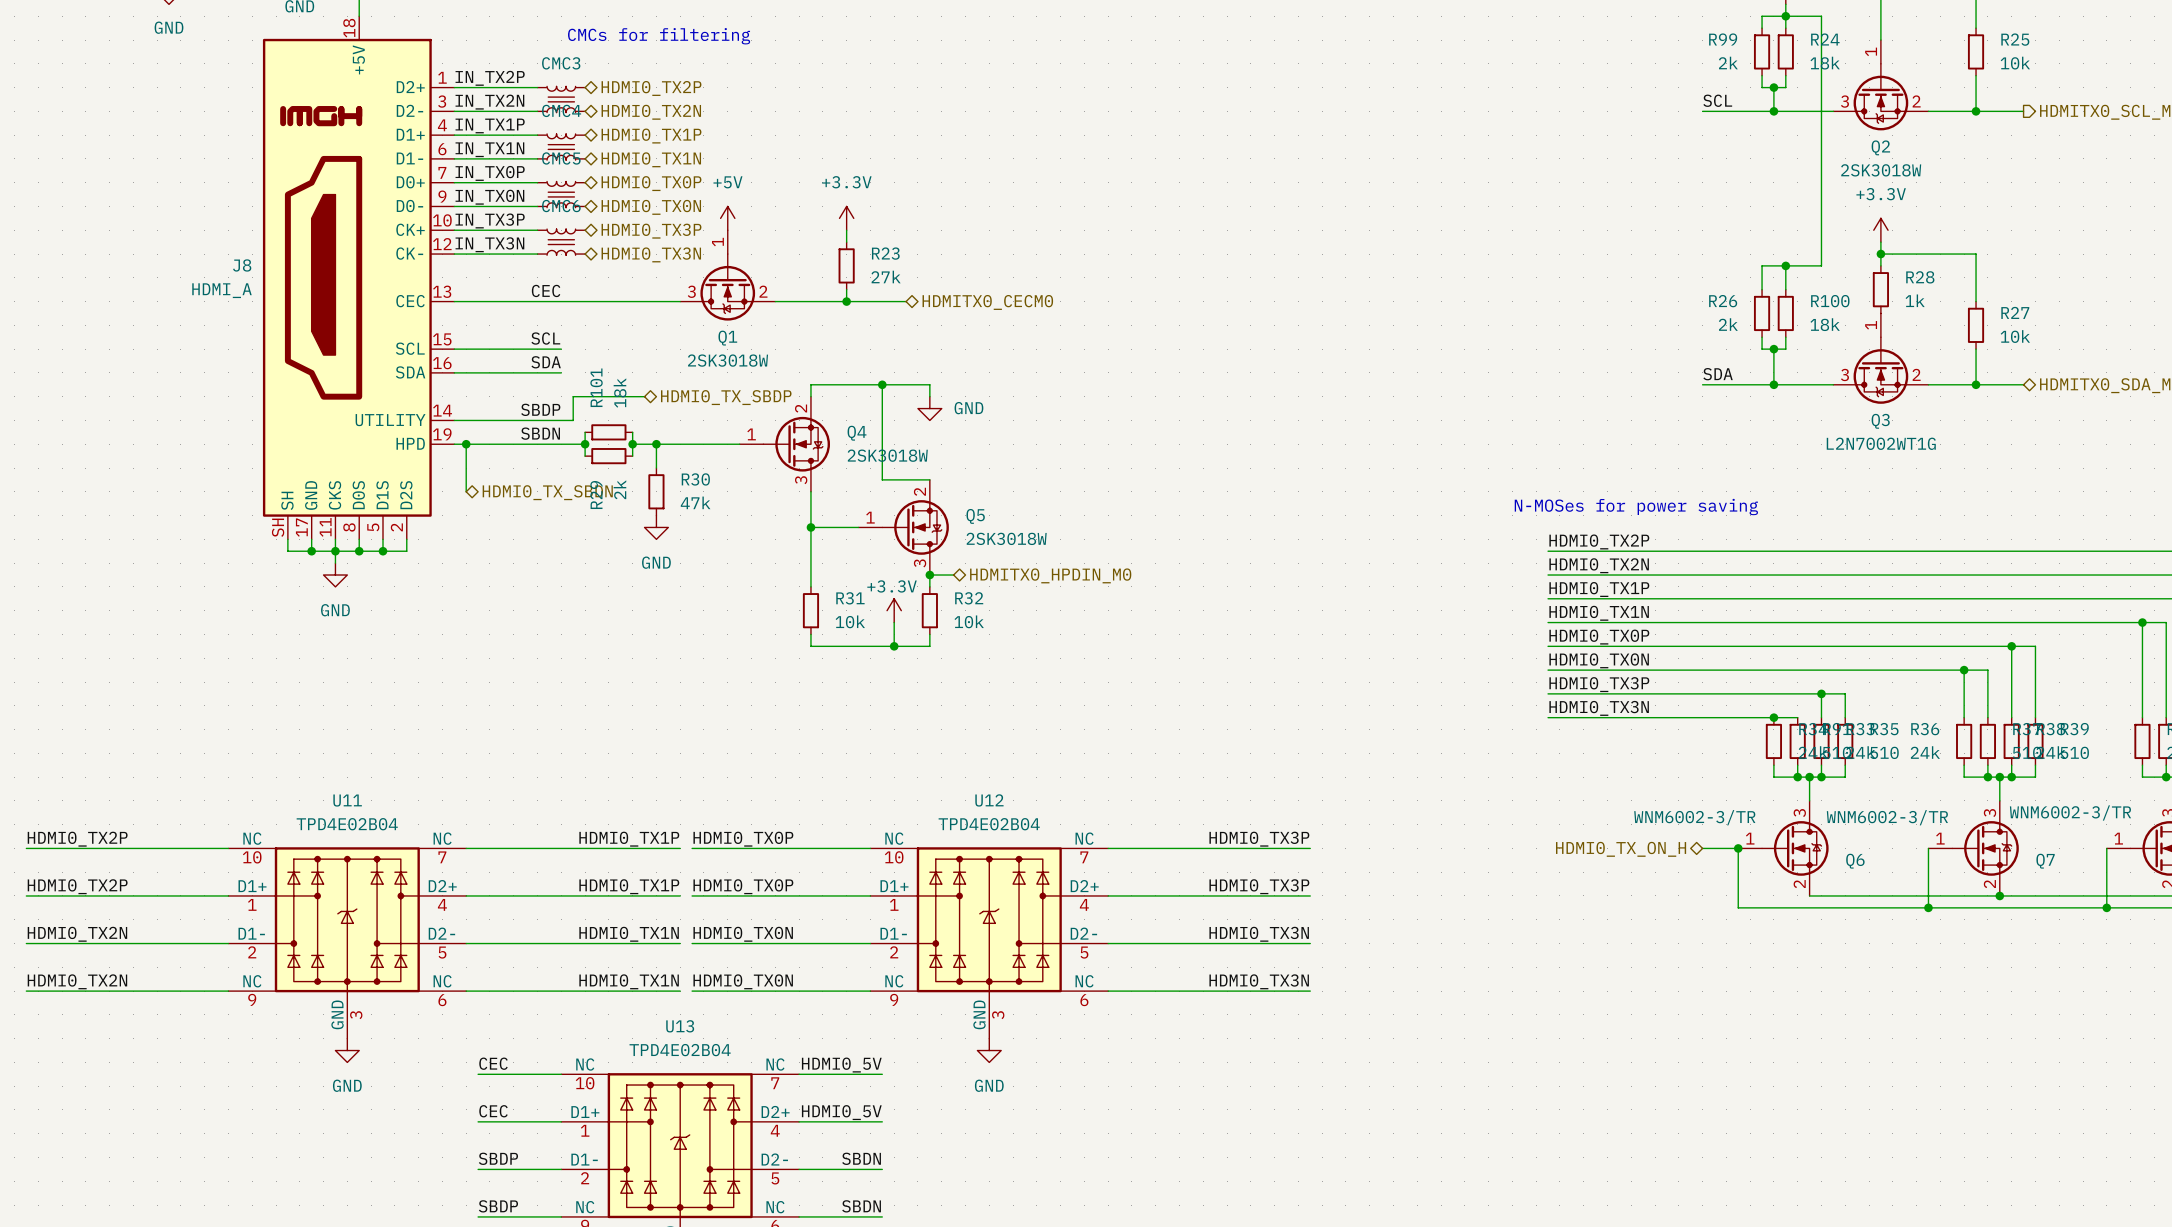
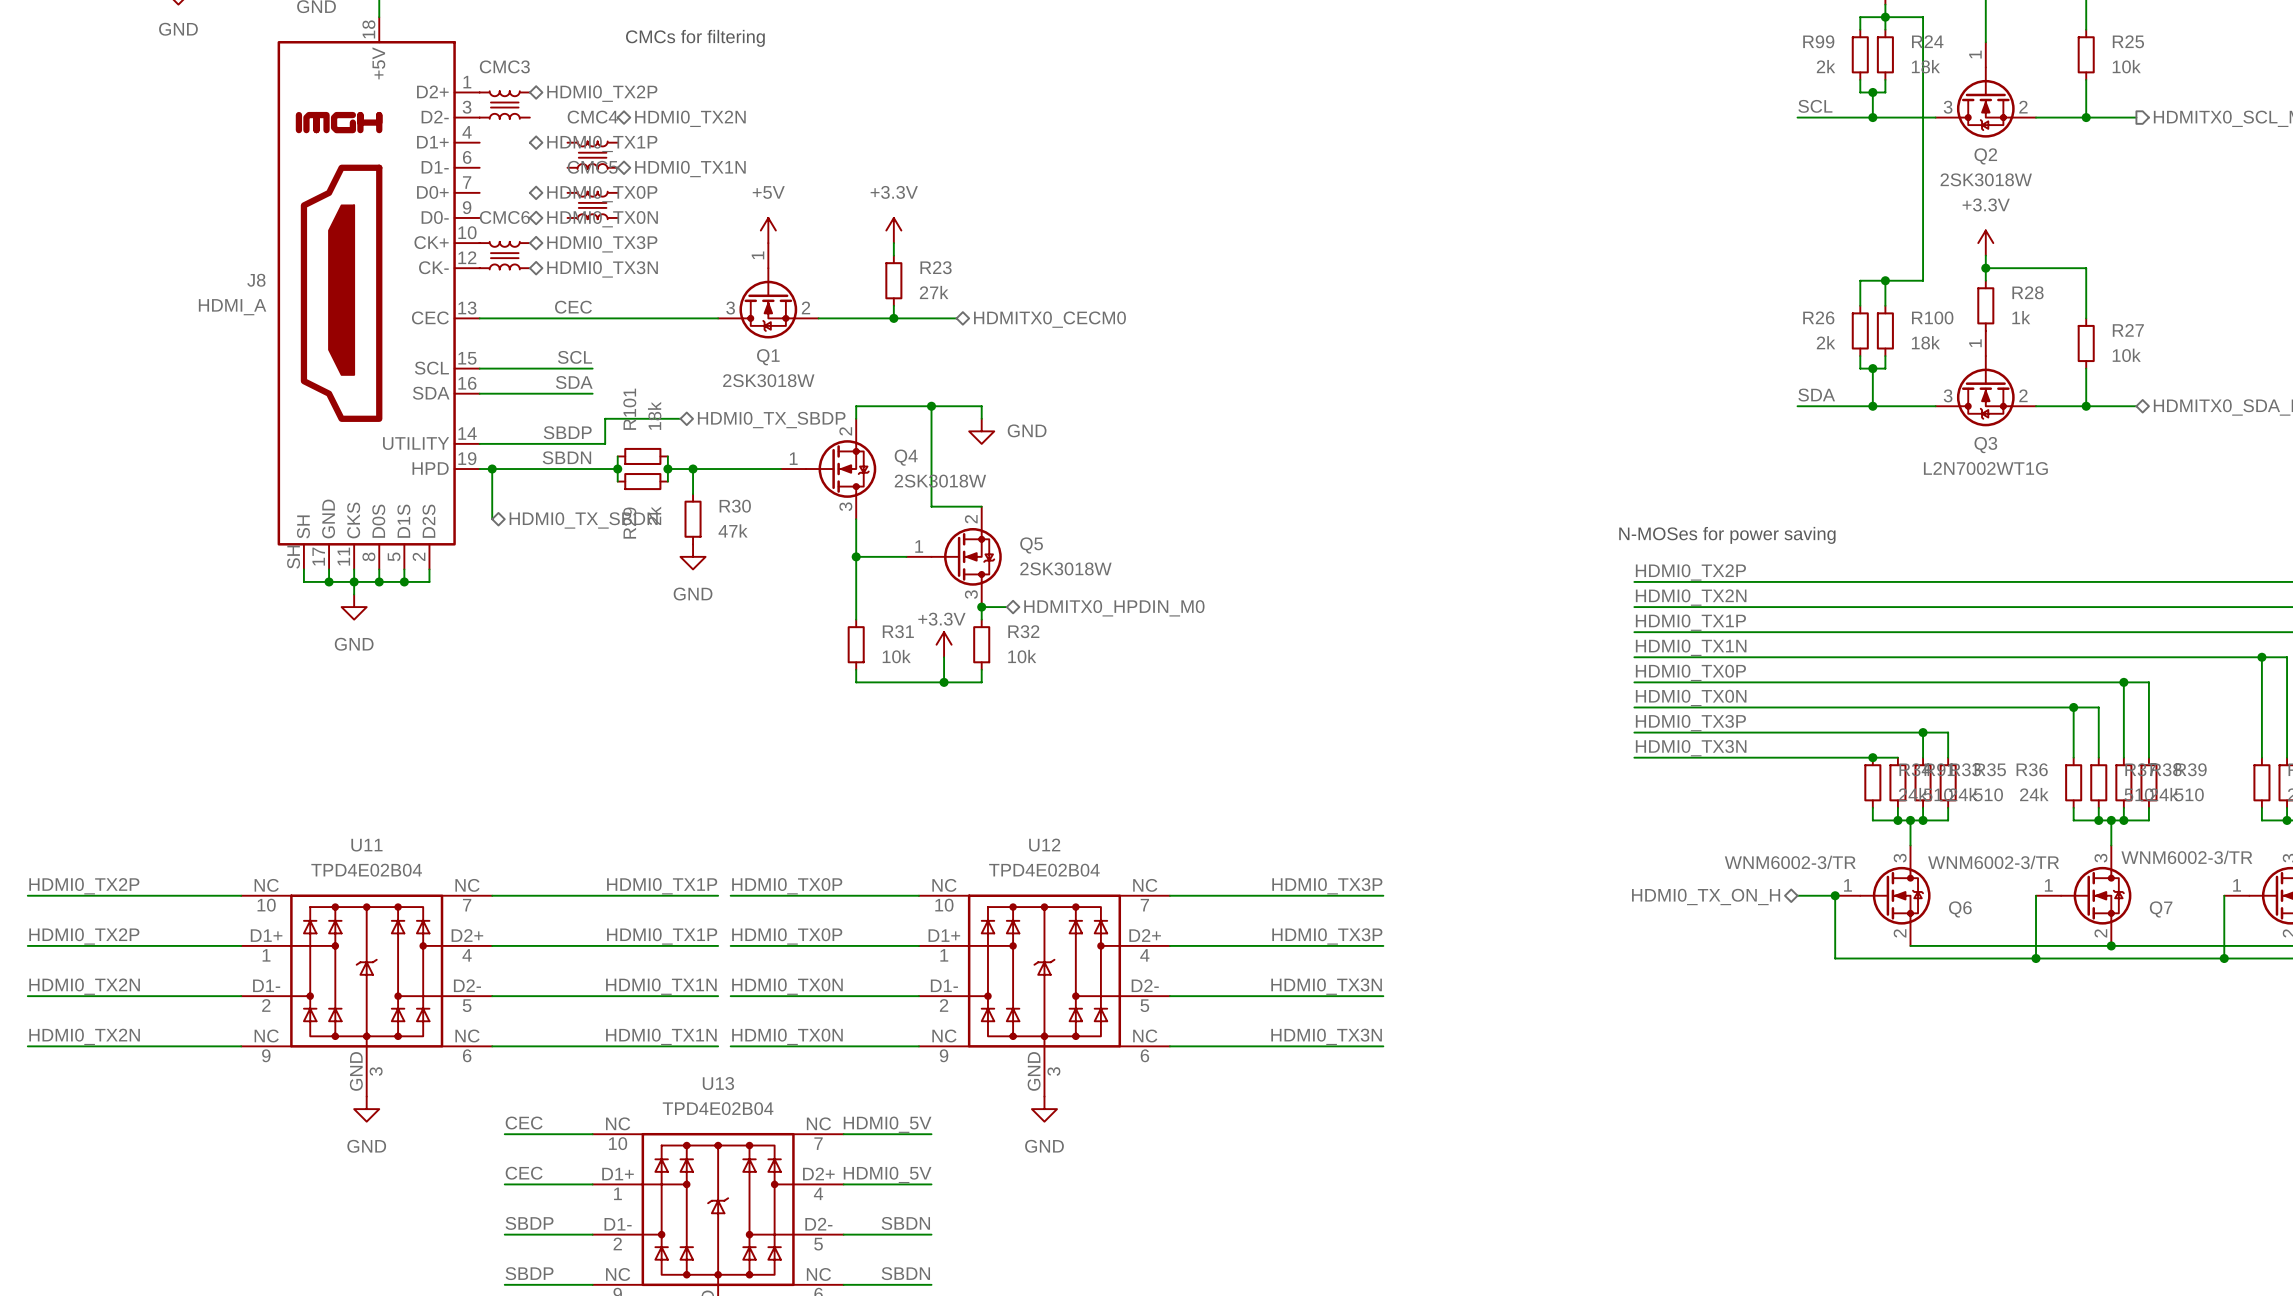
label: IN_TX2P (490, 78) -> none
wire: (454, 87) (537, 87) -> none
hierarchical label position: HDMI0_TX2P (651, 88) -> HDMI0_TX2P (602, 93)
CMC3 position: (561, 99) -> (504, 105)
label: IN_TX2N (489, 102) -> none
wire: (454, 111) (537, 111) -> none
label: IN_TX1P (490, 125) -> none
wire: (454, 135) (537, 135) -> none
hierarchical label position: HDMI0_TX1P (651, 136) -> HDMI0_TX1P (602, 143)
label: IN_TX1N (489, 149) -> none
wire: (454, 158) (537, 158) -> none
label: IN_TX0P (490, 173) -> none
wire: (454, 182) (537, 182) -> none
hierarchical label position: HDMI0_TX0P (651, 183) -> HDMI0_TX0P (602, 194)
label: IN_TX0N (489, 197) -> none
wire: (454, 206) (537, 206) -> none
hierarchical label position: HDMI0_TX0N (651, 207) -> HDMI0_TX0N (602, 219)
label: IN_TX3P (490, 220) -> none
wire: (454, 230) (537, 230) -> none
hierarchical label position: HDMI0_TX3P (651, 231) -> HDMI0_TX3P (602, 244)
CMC6 position: (561, 242) -> (504, 255)
label: IN_TX3N (489, 244) -> none
wire: (454, 254) (537, 254) -> none
hierarchical label position: HDMI0_TX3N (651, 254) -> HDMI0_TX3N (602, 269)

